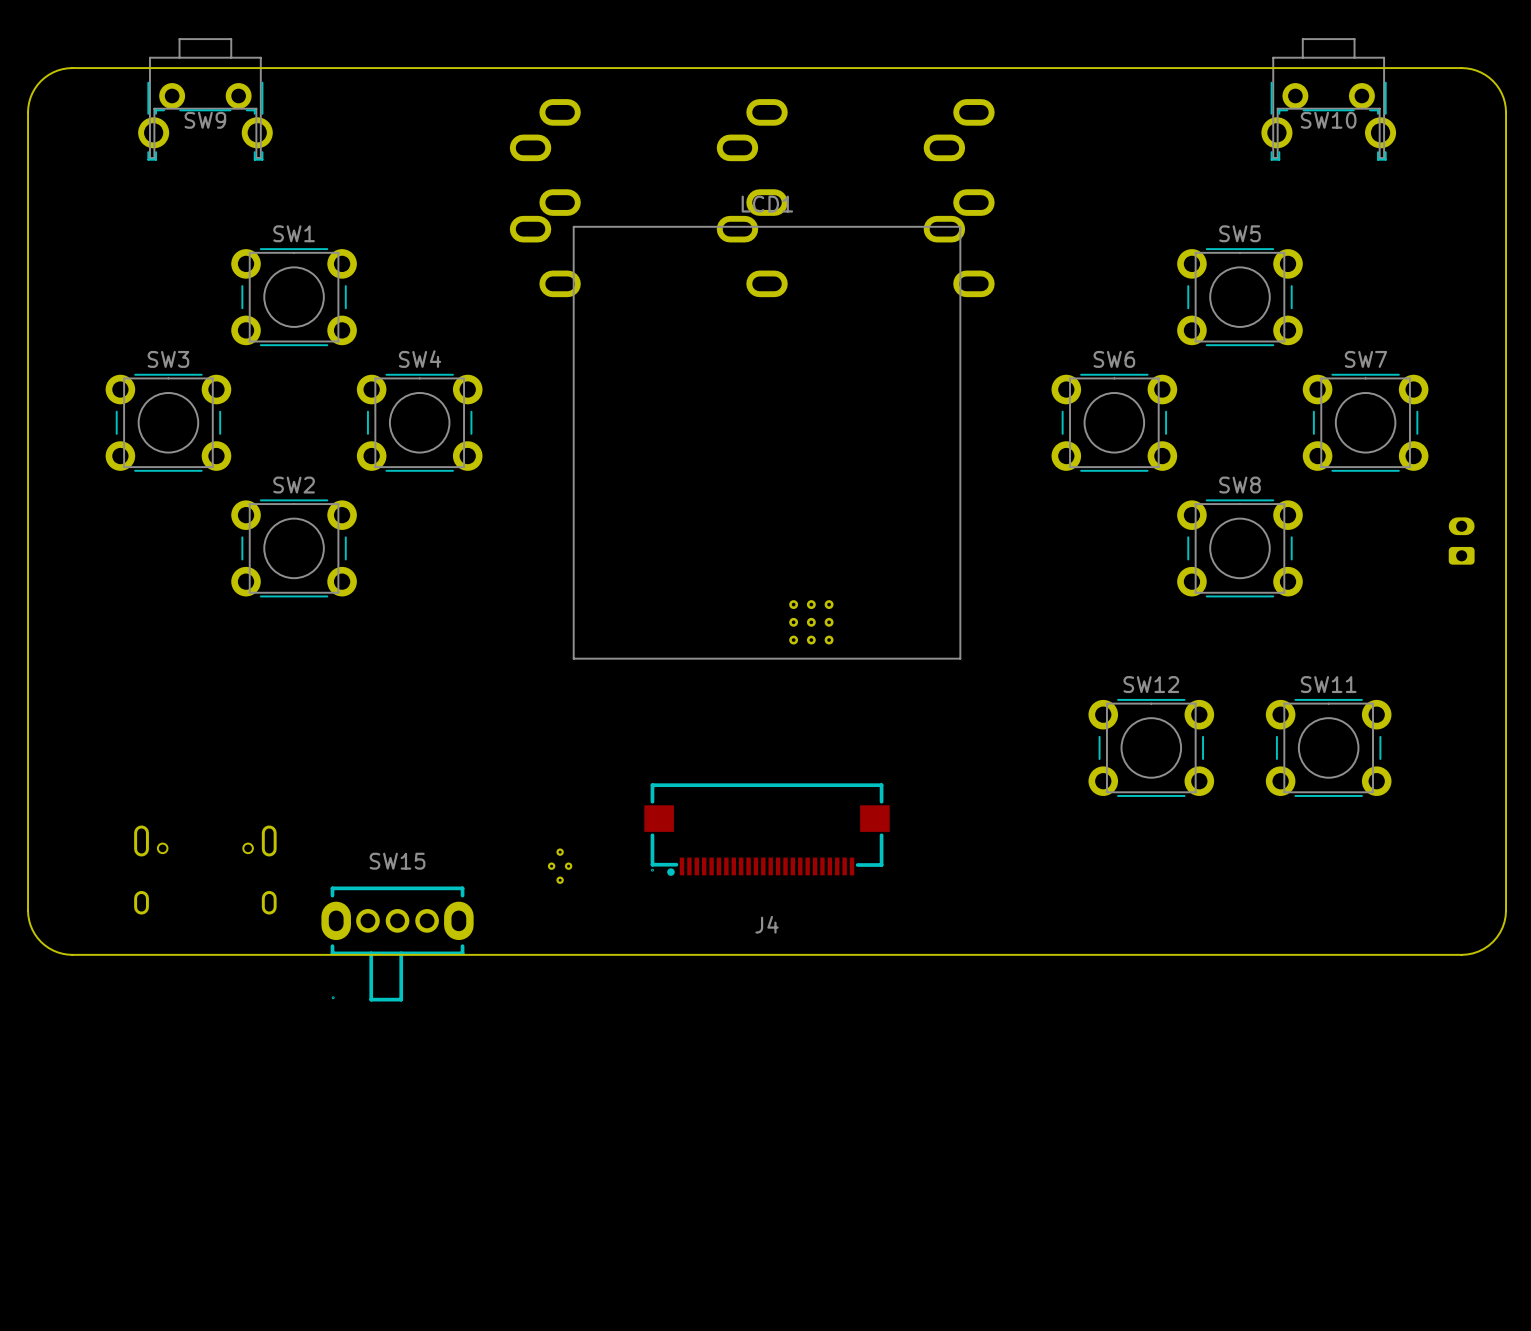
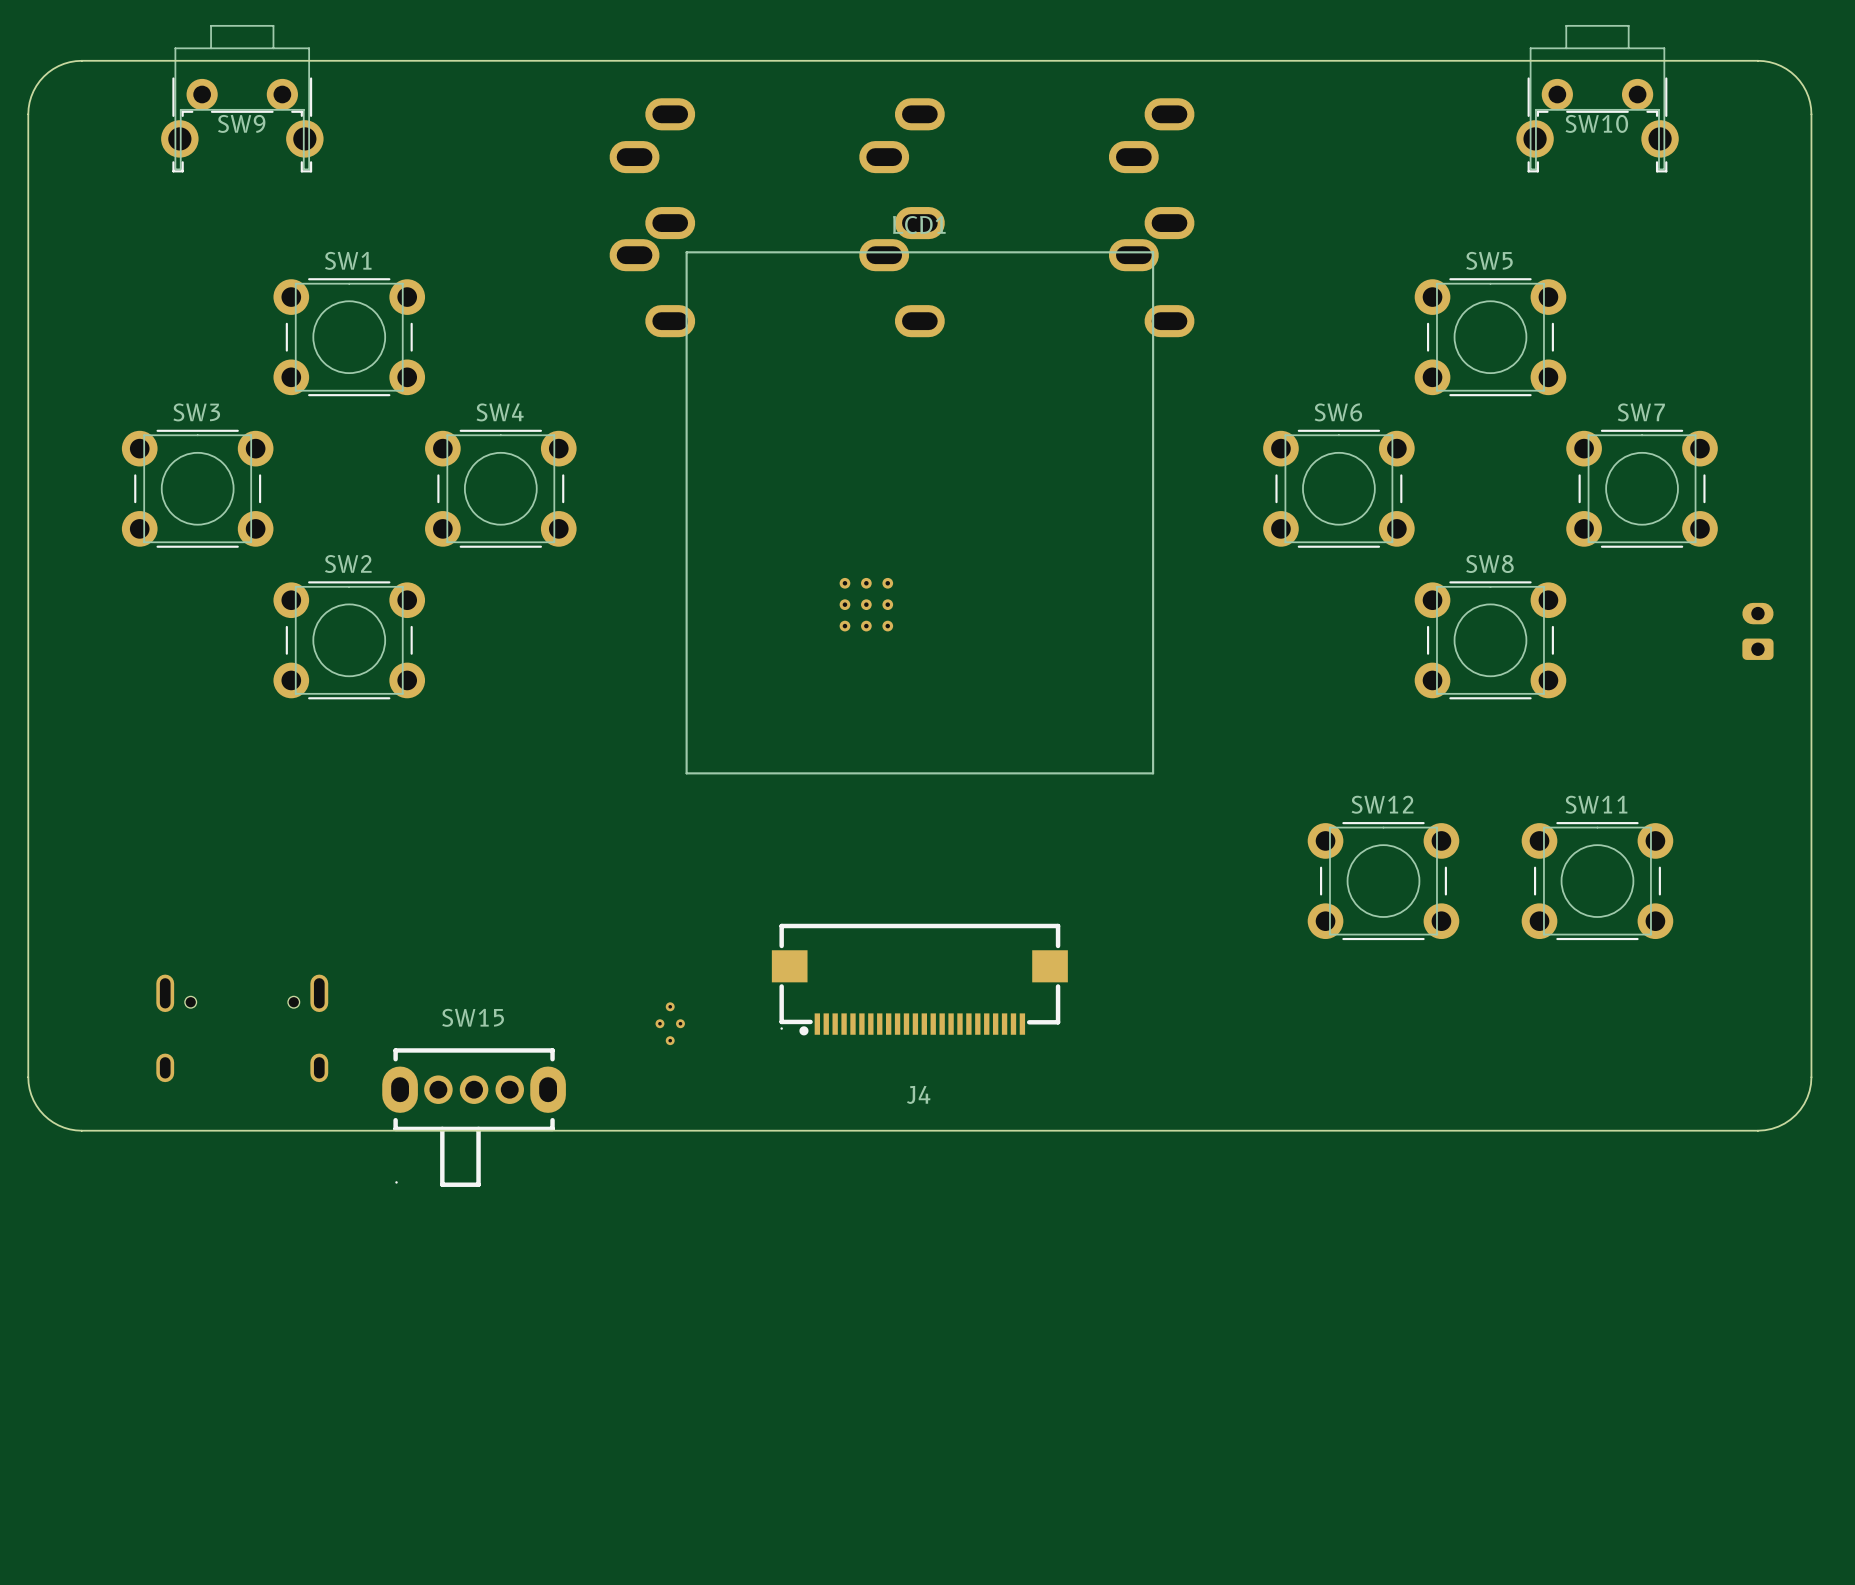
part position: (811, 622) -> (866, 604)

